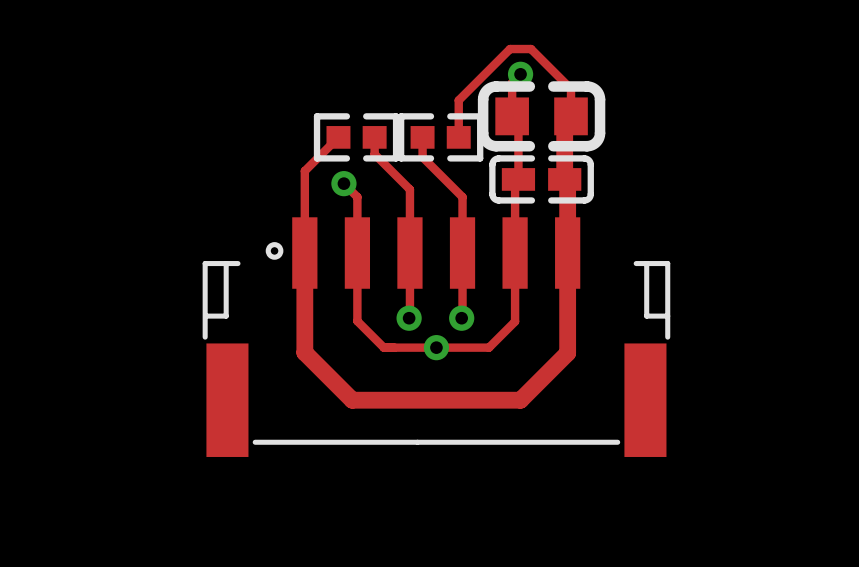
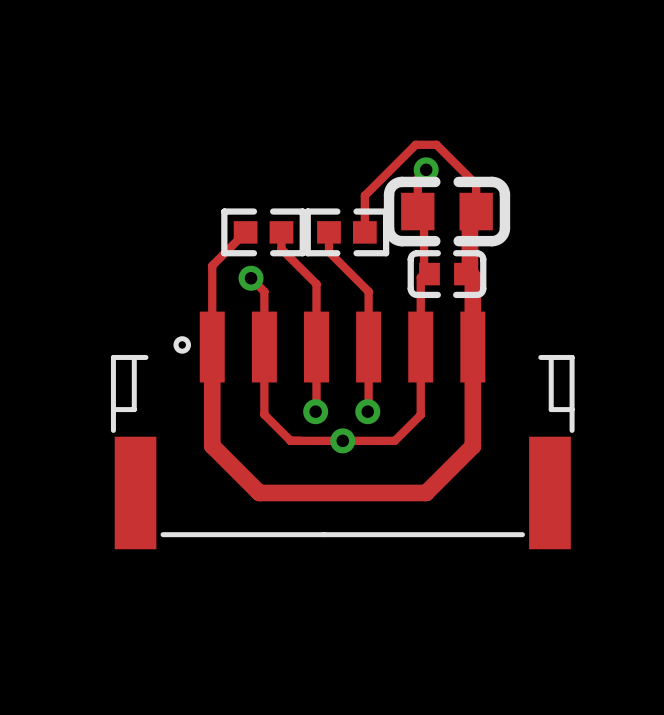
part footprint: [489, 155, 594, 204] -> [407, 250, 487, 299]

